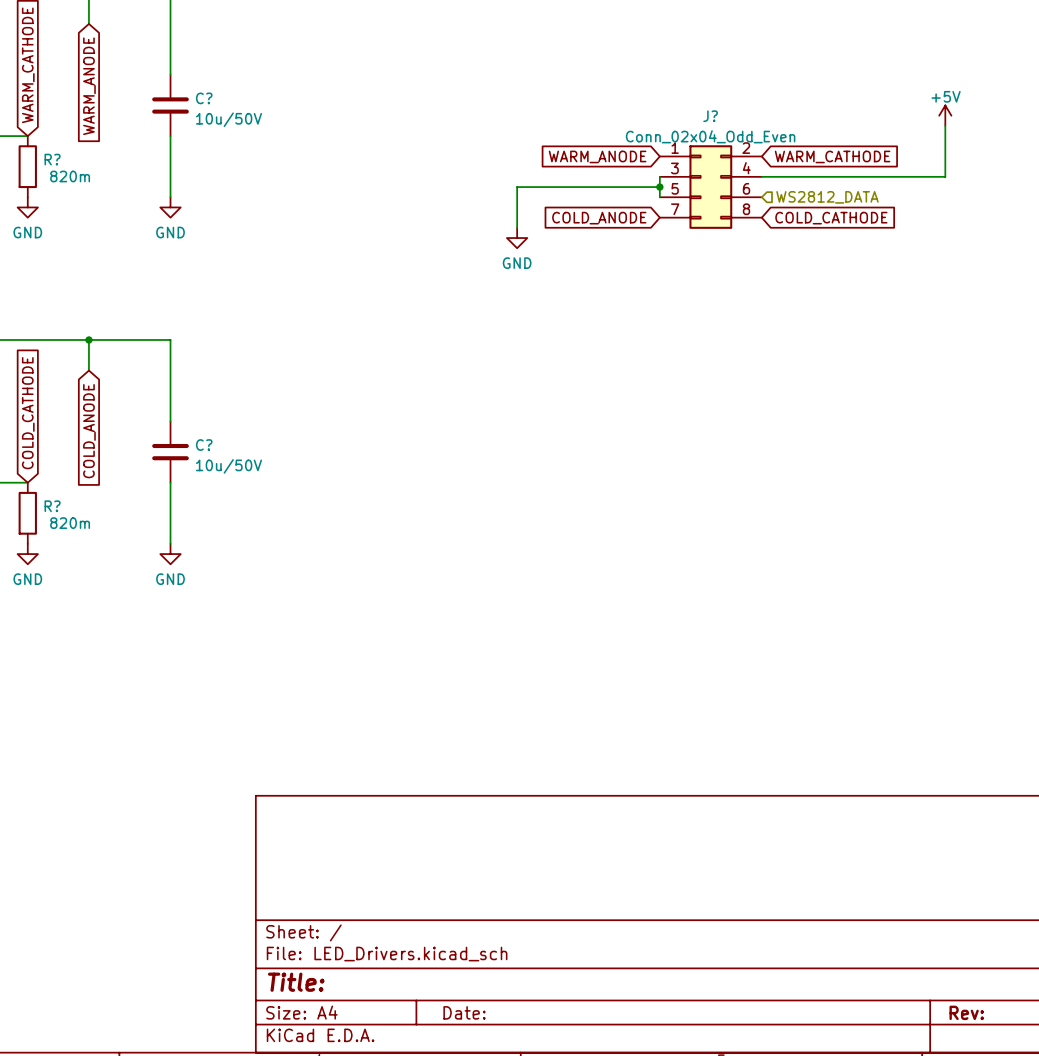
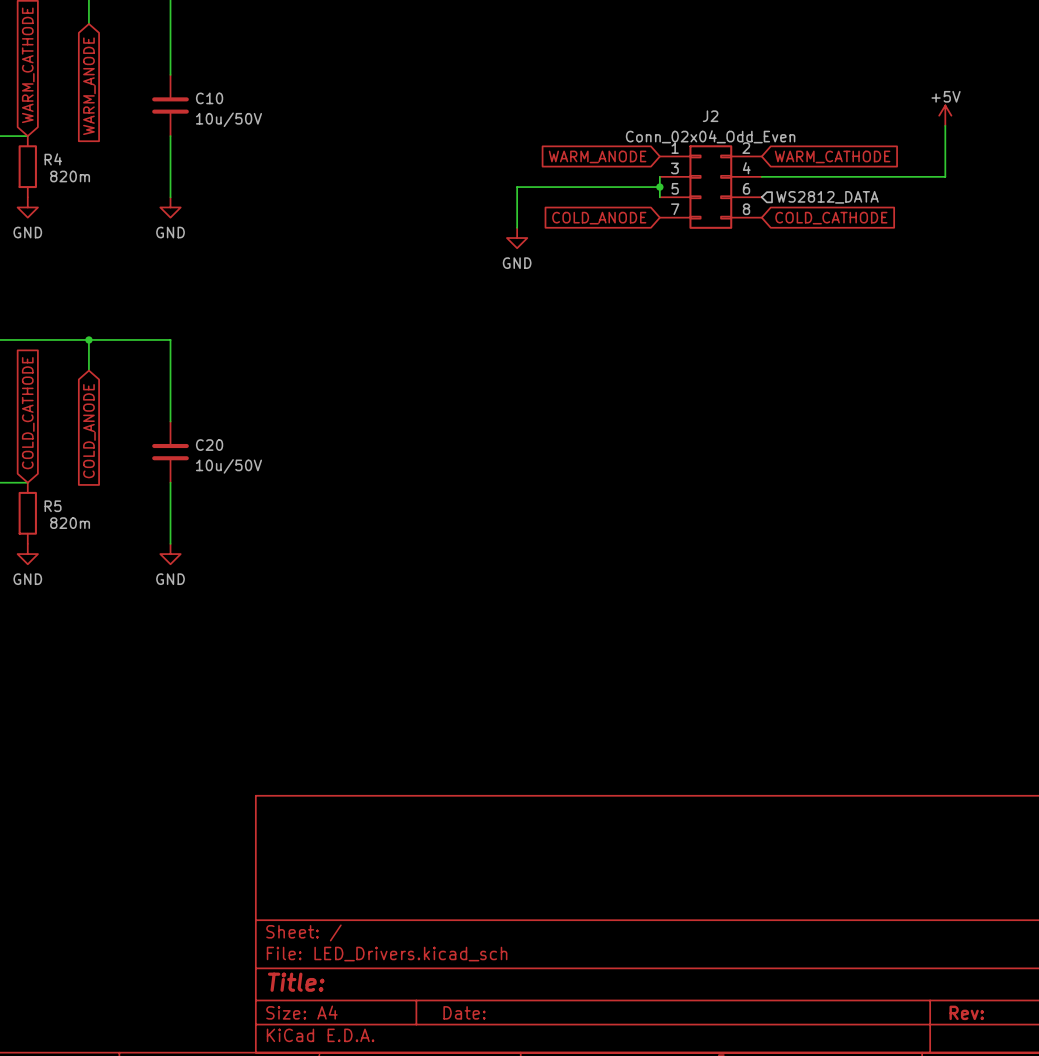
C? name: C? (204, 98) -> C10 (209, 98)
J? name: J? (710, 116) -> J2 (710, 116)
R? name: R? (52, 159) -> R4 (53, 159)
C? name: C? (204, 445) -> C20 (209, 445)
R? name: R? (52, 506) -> R5 (53, 506)

